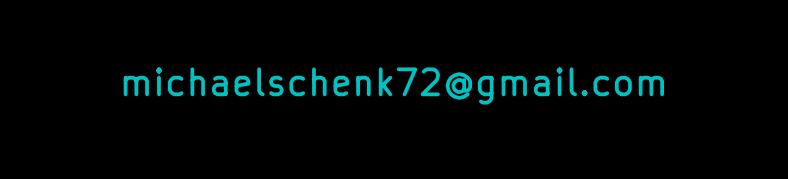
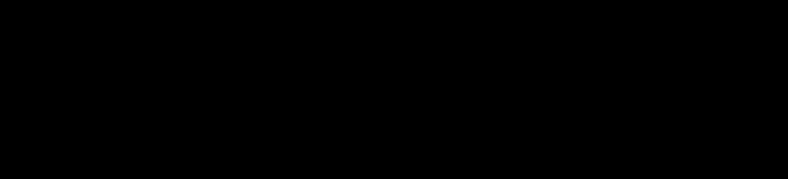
text: michaelschenk72@gmail.com (393, 86) -> none

